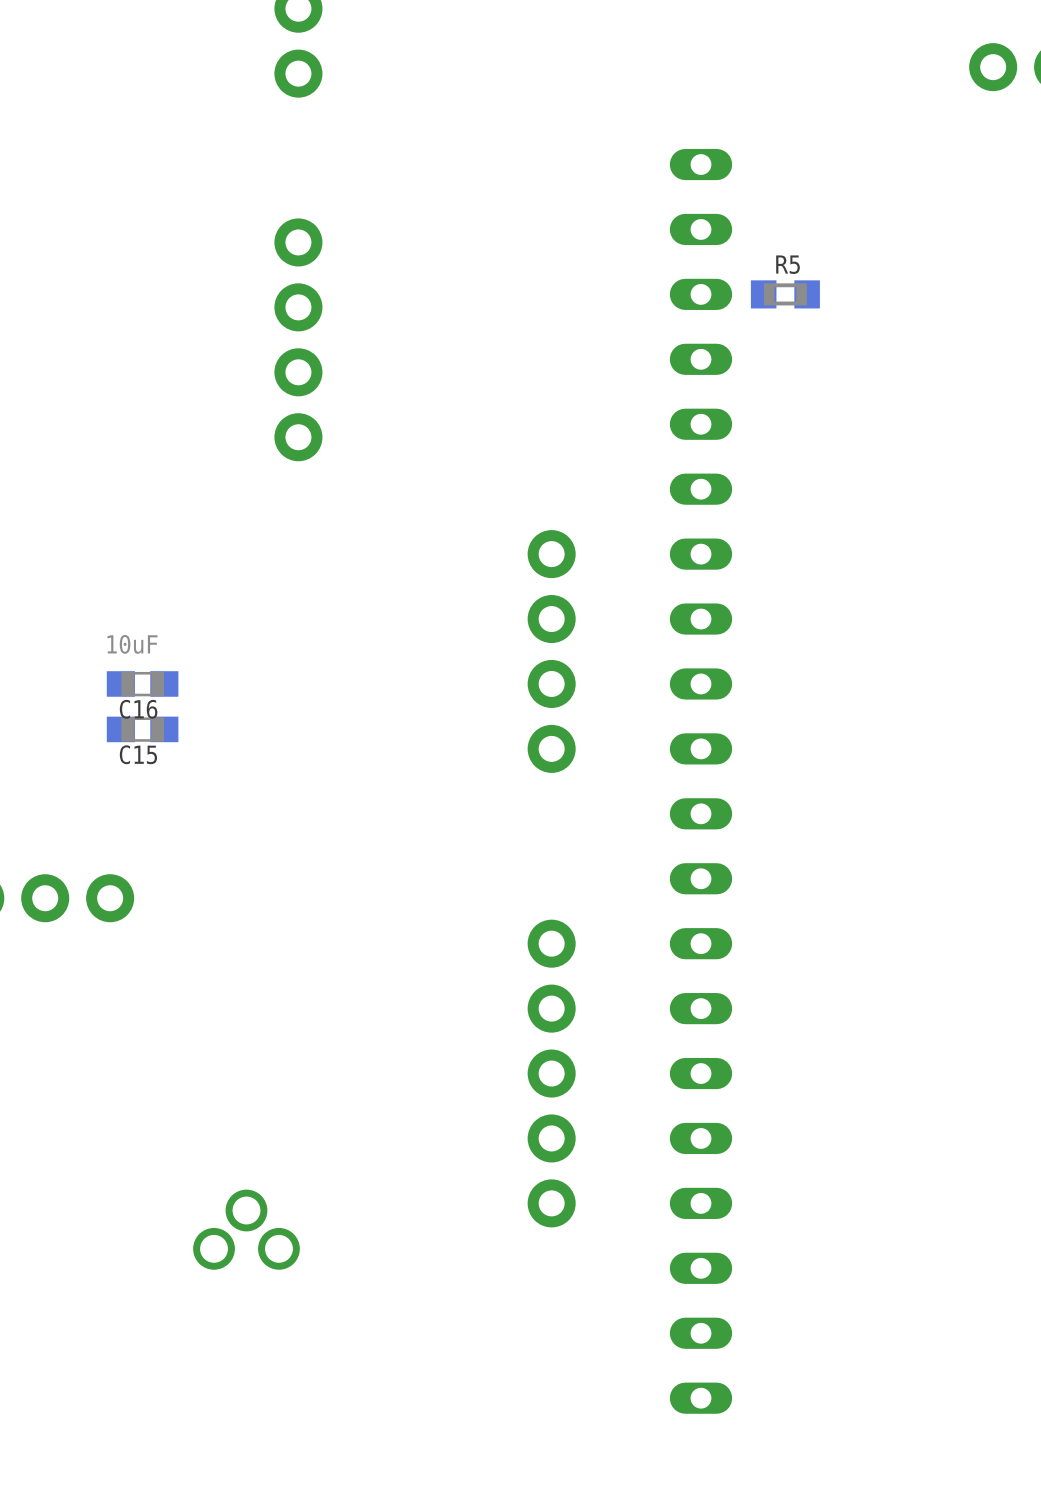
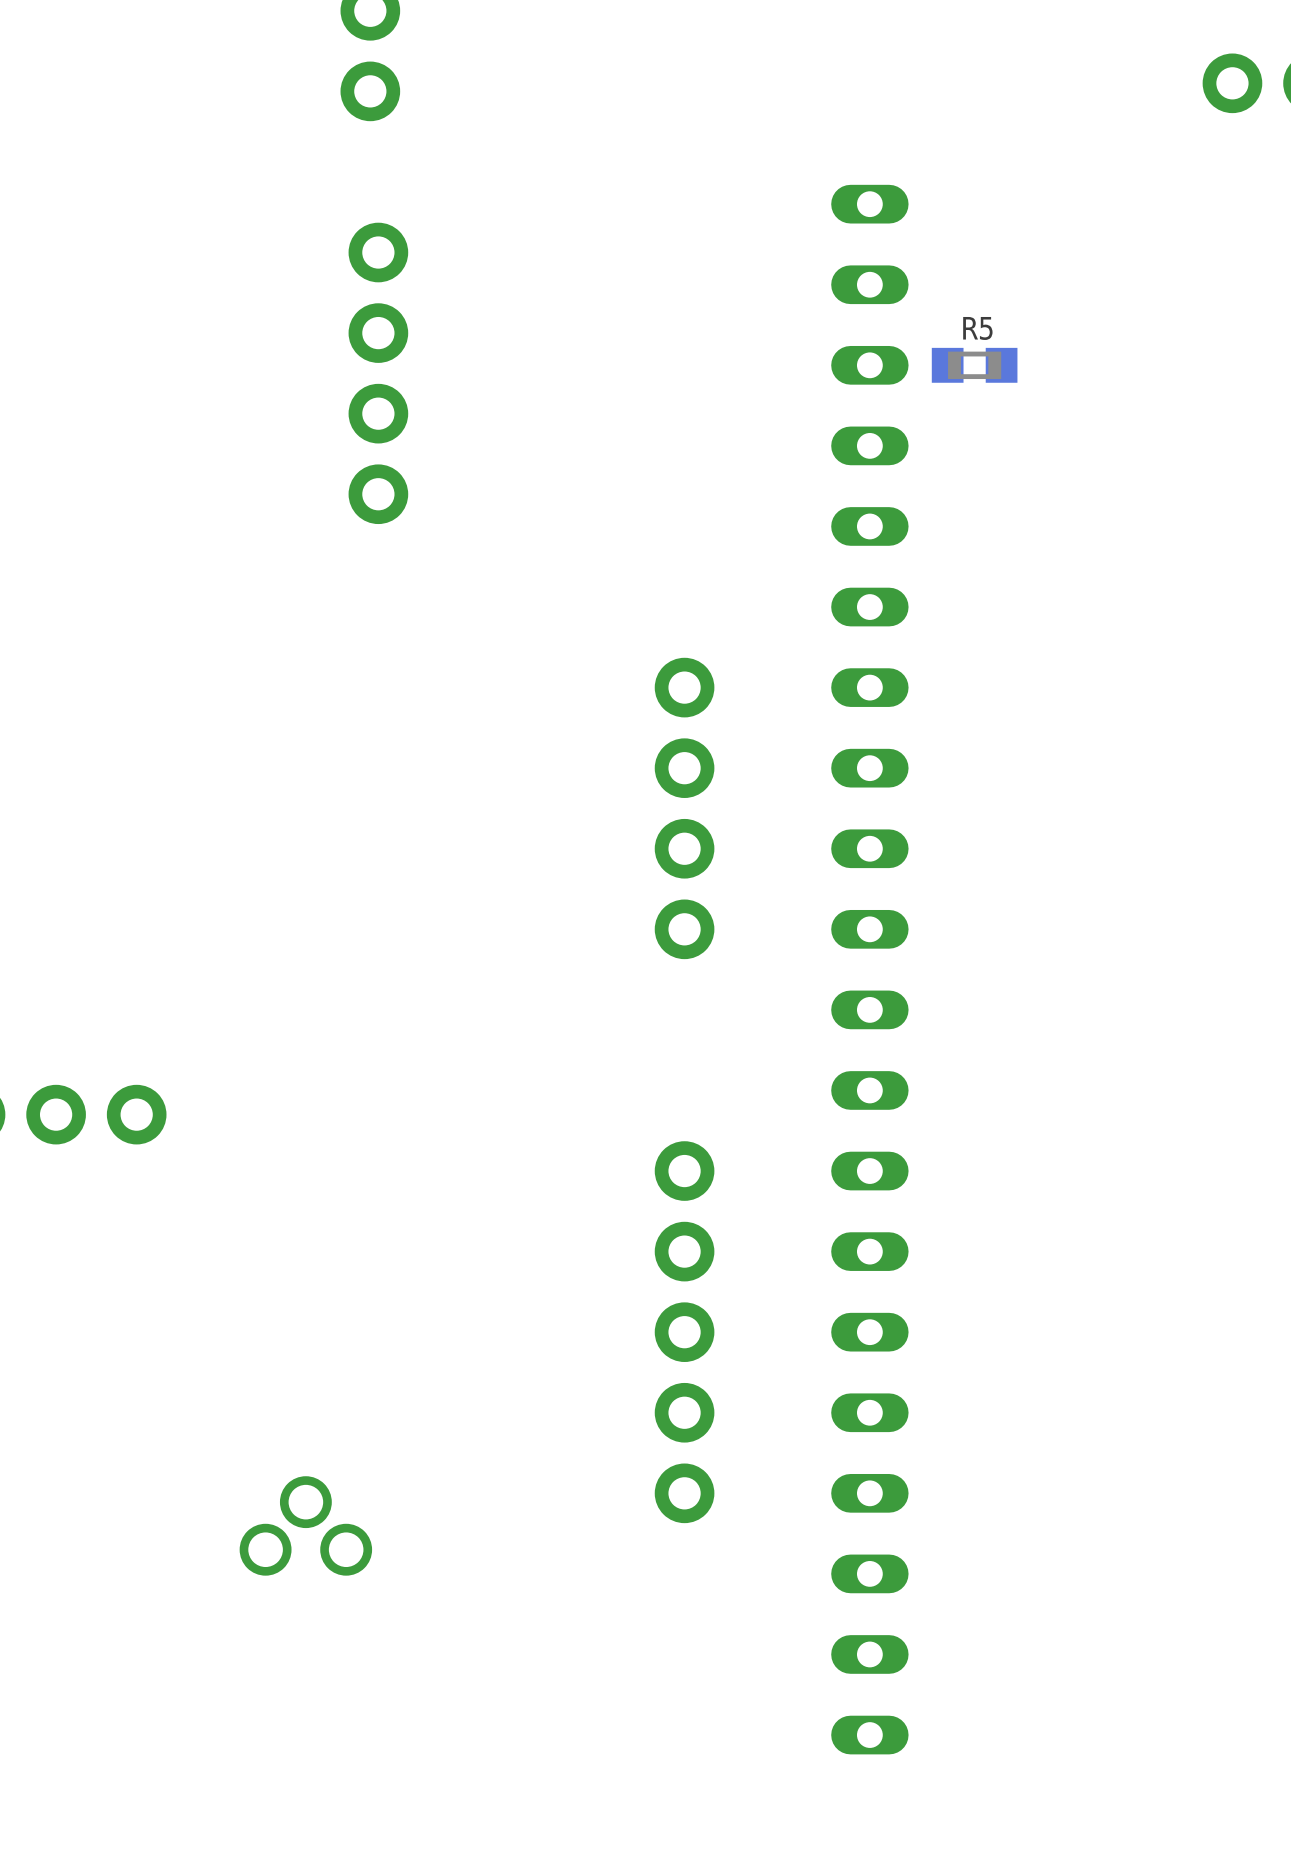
part position: (298, 339) -> (378, 373)
C16: 10uF (142, 683) -> none
C15: (142, 729) -> none

